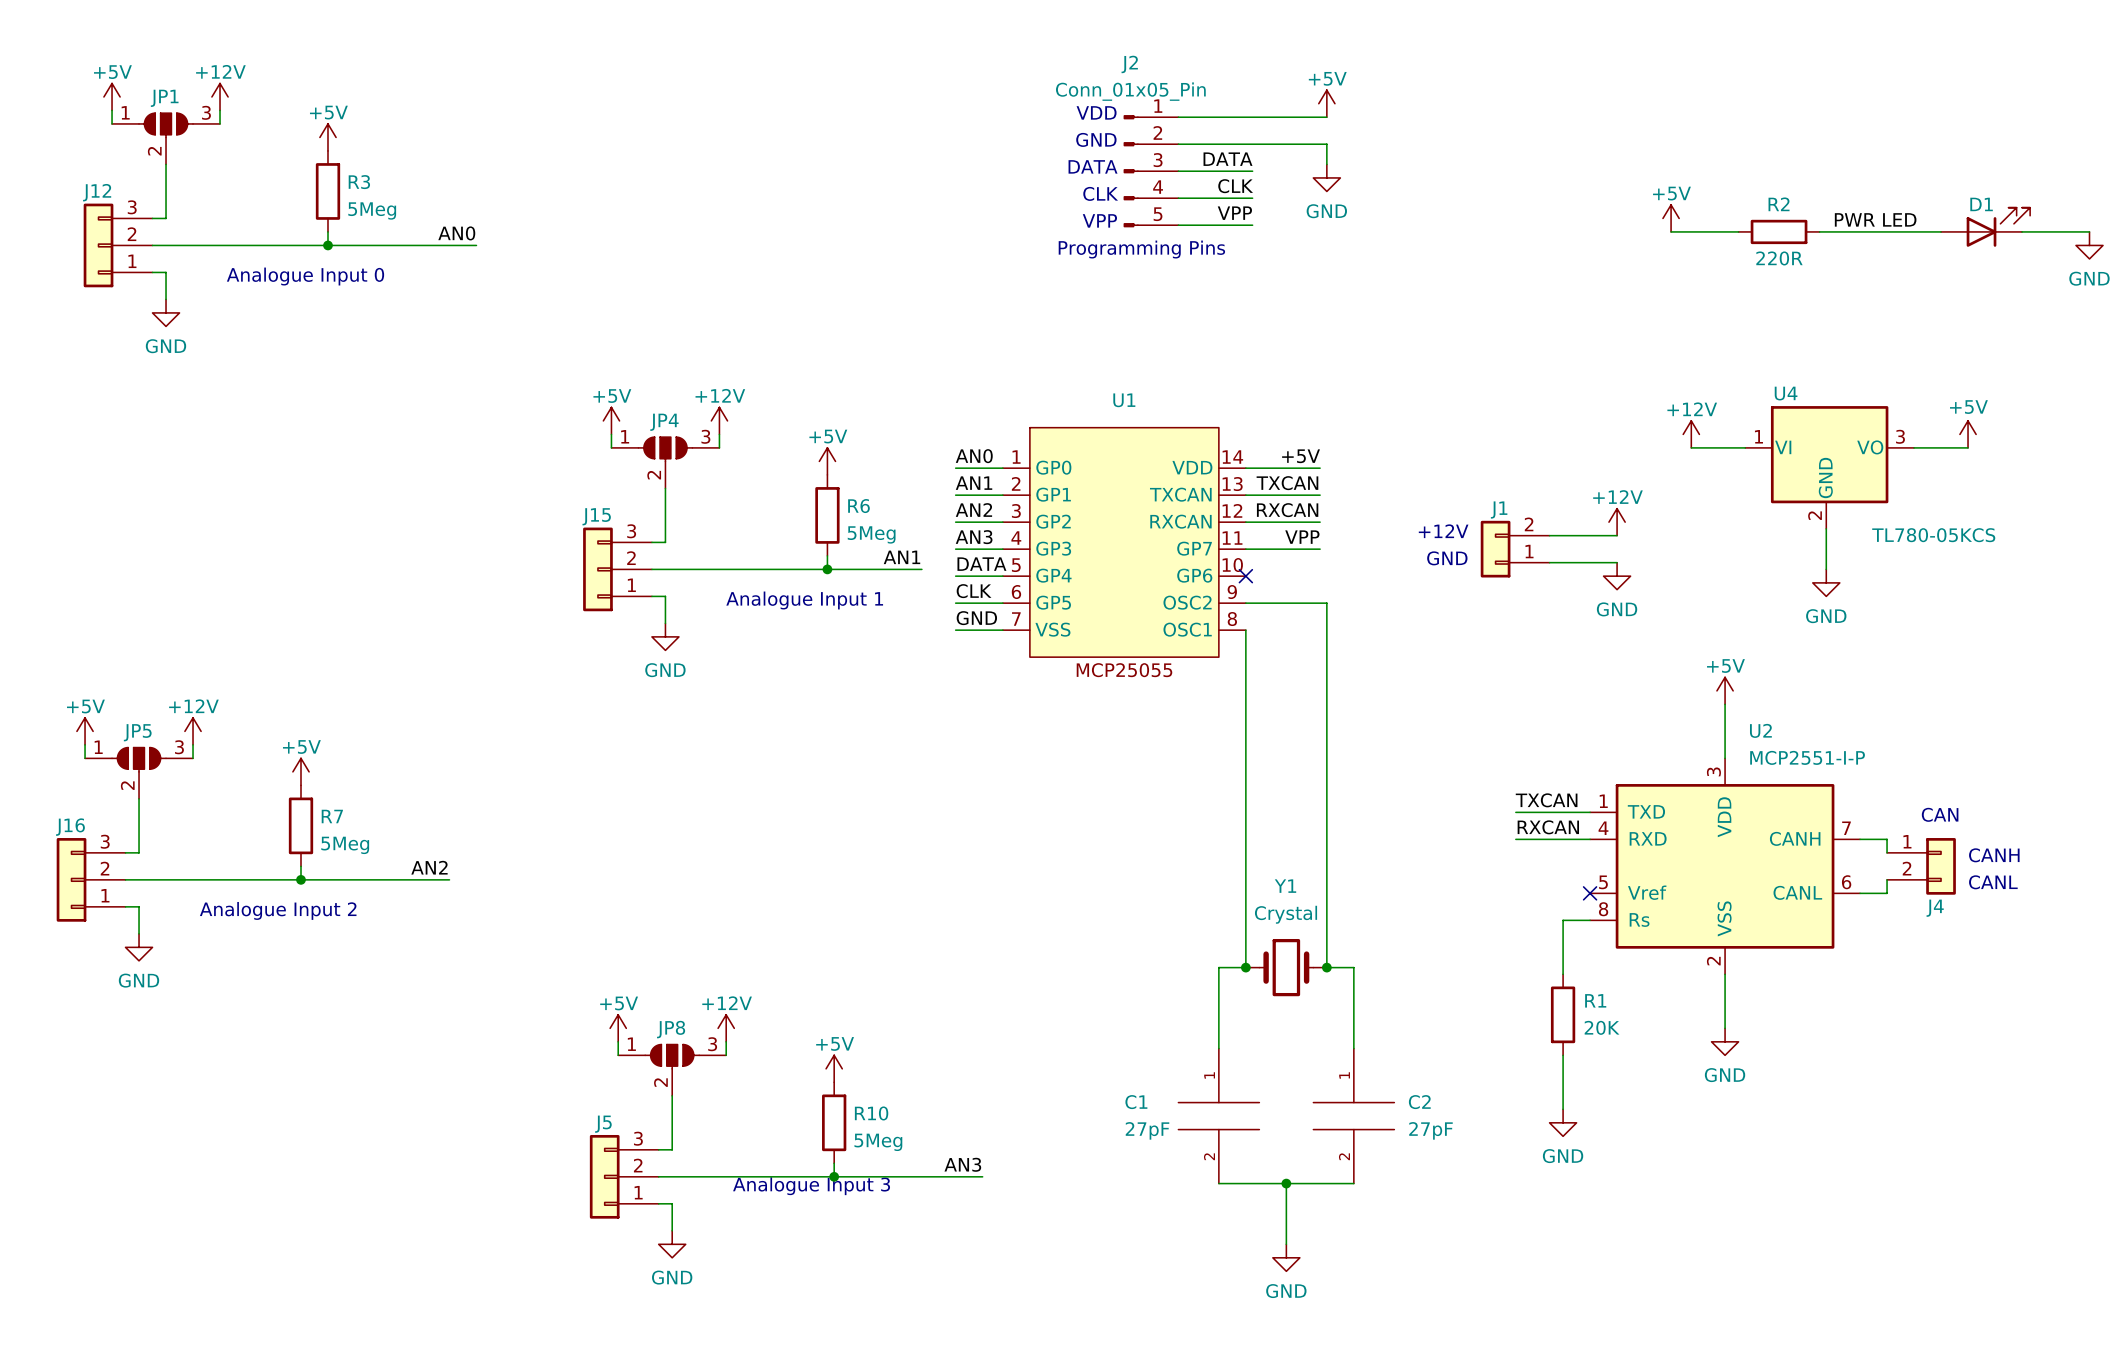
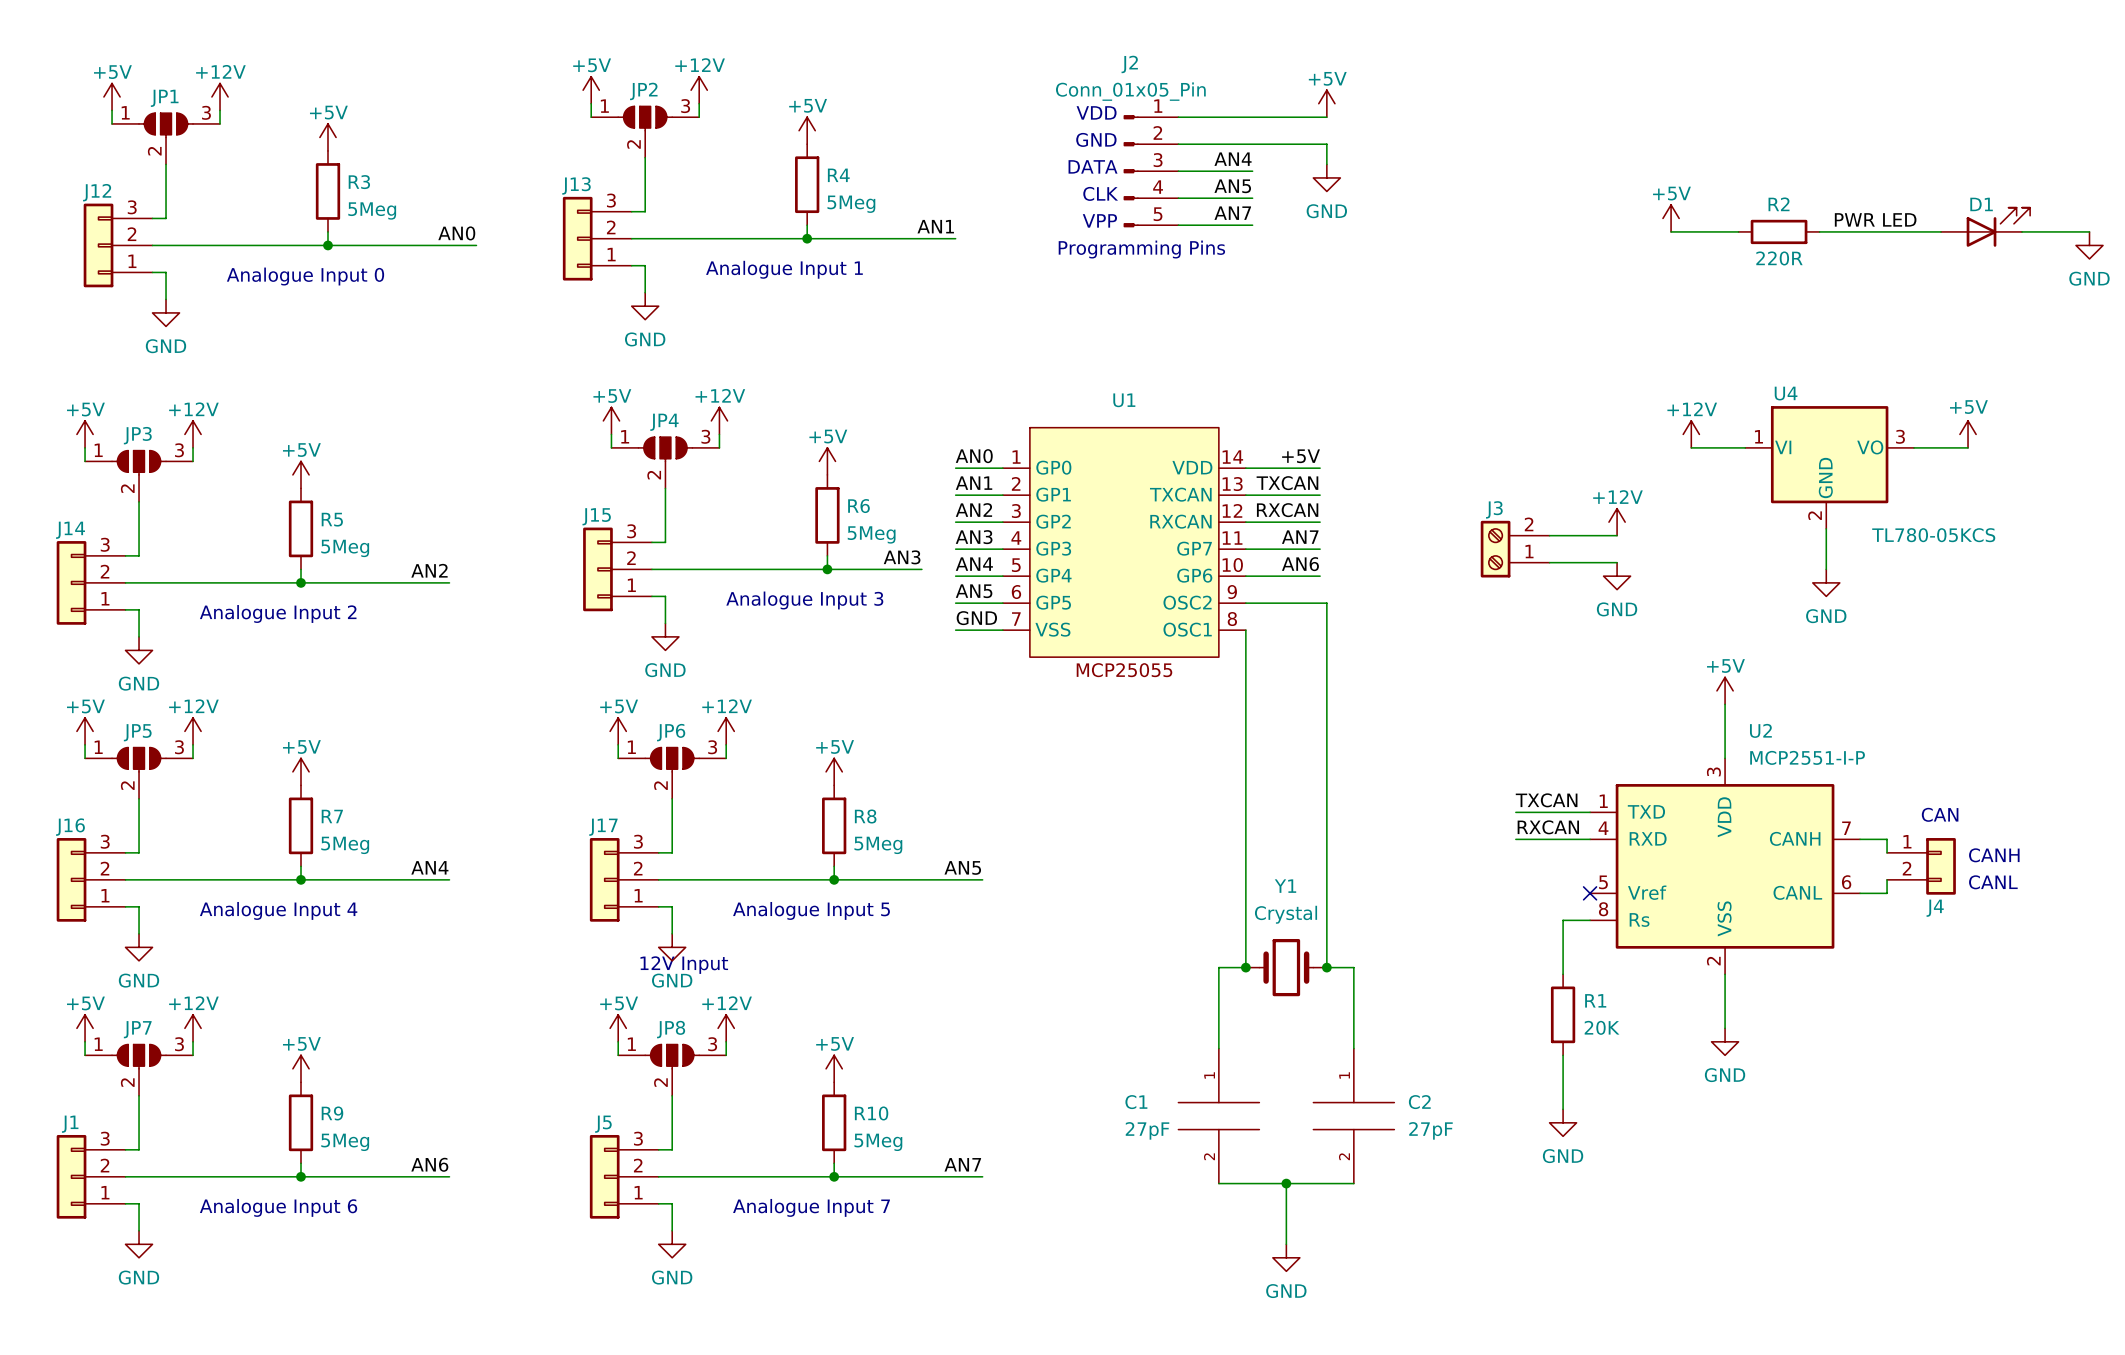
power symbol: none -> +5V (591, 90)
power symbol: none -> +12V (699, 90)
wire: none -> (591, 103) (591, 117)
wire: none -> (699, 103) (699, 117)
power symbol: none -> +5V (807, 130)
JP2: none -> (645, 132)
wire: none -> (645, 157) (645, 211) (631, 211)
label: DATA (1228, 159) -> AN4 (1233, 159)
R4: none -> 5Meg (807, 184)
label: CLK (1235, 186) -> AN5 (1232, 186)
label: VPP (1234, 213) -> AN7 (1232, 213)
wire: none -> (807, 225) (807, 238)
label: none -> AN1 (935, 226)
J13: none -> (597, 238)
wire: none -> (631, 238) (955, 238)
junction: none -> (807, 238)
wire: none -> (631, 265) (645, 265) (645, 292)
text: none -> Analogue Input 1 (784, 269)
power symbol: none -> GND (645, 306)
power symbol: none -> +5V (85, 434)
power symbol: none -> +12V (193, 434)
wire: none -> (85, 447) (85, 461)
wire: none -> (193, 447) (193, 461)
power symbol: none -> +5V (300, 474)
JP3: none -> (139, 476)
wire: none -> (139, 501) (139, 555) (125, 555)
J1 symbol: [1480, 520, 1550, 578] -> [56, 1134, 126, 1219]
R5: none -> 5Meg (300, 528)
text: +12V (1443, 531) -> none
label: VPP (1302, 537) -> AN7 (1300, 537)
J3: none -> (1515, 549)
label: AN1 (901, 557) -> AN3 (902, 557)
text: GND (1447, 558) -> none
label: DATA (981, 564) -> AN4 (974, 564)
label: none -> AN6 (1300, 564)
wire: none -> (300, 569) (300, 582)
label: none -> AN2 (429, 570)
wire: none -> (1245, 576) (1320, 576)
no-connect mark: (1245, 576) -> none
J14: none -> (91, 582)
wire: none -> (125, 582) (449, 582)
junction: none -> (300, 582)
label: CLK (974, 591) -> AN5 (974, 591)
text: Analogue Input 1 (804, 600) -> Analogue Input 3 (804, 600)
wire: none -> (125, 609) (139, 609) (139, 636)
text: none -> Analogue Input 2 (278, 613)
power symbol: none -> GND (139, 650)
power symbol: none -> +5V (618, 731)
power symbol: none -> +12V (726, 731)
wire: none -> (618, 744) (618, 758)
wire: none -> (726, 744) (726, 758)
power symbol: none -> +5V (834, 771)
JP6: none -> (672, 773)
wire: none -> (672, 798) (672, 852) (658, 852)
R8: none -> 5Meg (834, 825)
wire: none -> (834, 866) (834, 879)
label: AN2 (429, 867) -> AN4 (429, 867)
label: none -> AN5 (962, 867)
J17: none -> (624, 879)
wire: none -> (658, 879) (982, 879)
junction: none -> (834, 879)
wire: none -> (658, 906) (672, 906) (672, 933)
text: Analogue Input 2 (278, 910) -> Analogue Input 4 (278, 910)
text: none -> Analogue Input 5 (811, 910)
power symbol: none -> GND (672, 947)
text: none -> 12V Input (684, 965)
power symbol: none -> +5V (85, 1028)
power symbol: none -> +12V (193, 1028)
wire: none -> (85, 1041) (85, 1055)
wire: none -> (193, 1041) (193, 1055)
power symbol: none -> +5V (300, 1068)
JP7: none -> (139, 1070)
wire: none -> (139, 1095) (139, 1149) (125, 1149)
R9: none -> 5Meg (300, 1122)
wire: none -> (300, 1163) (300, 1176)
label: none -> AN6 (429, 1164)
label: AN3 (962, 1164) -> AN7 (962, 1164)
wire: none -> (125, 1176) (449, 1176)
junction: none -> (300, 1176)
text: Analogue Input 3 (811, 1186) -> Analogue Input 7 (811, 1207)
wire: none -> (125, 1203) (139, 1203) (139, 1230)
text: none -> Analogue Input 6 (278, 1207)
power symbol: none -> GND (139, 1244)

